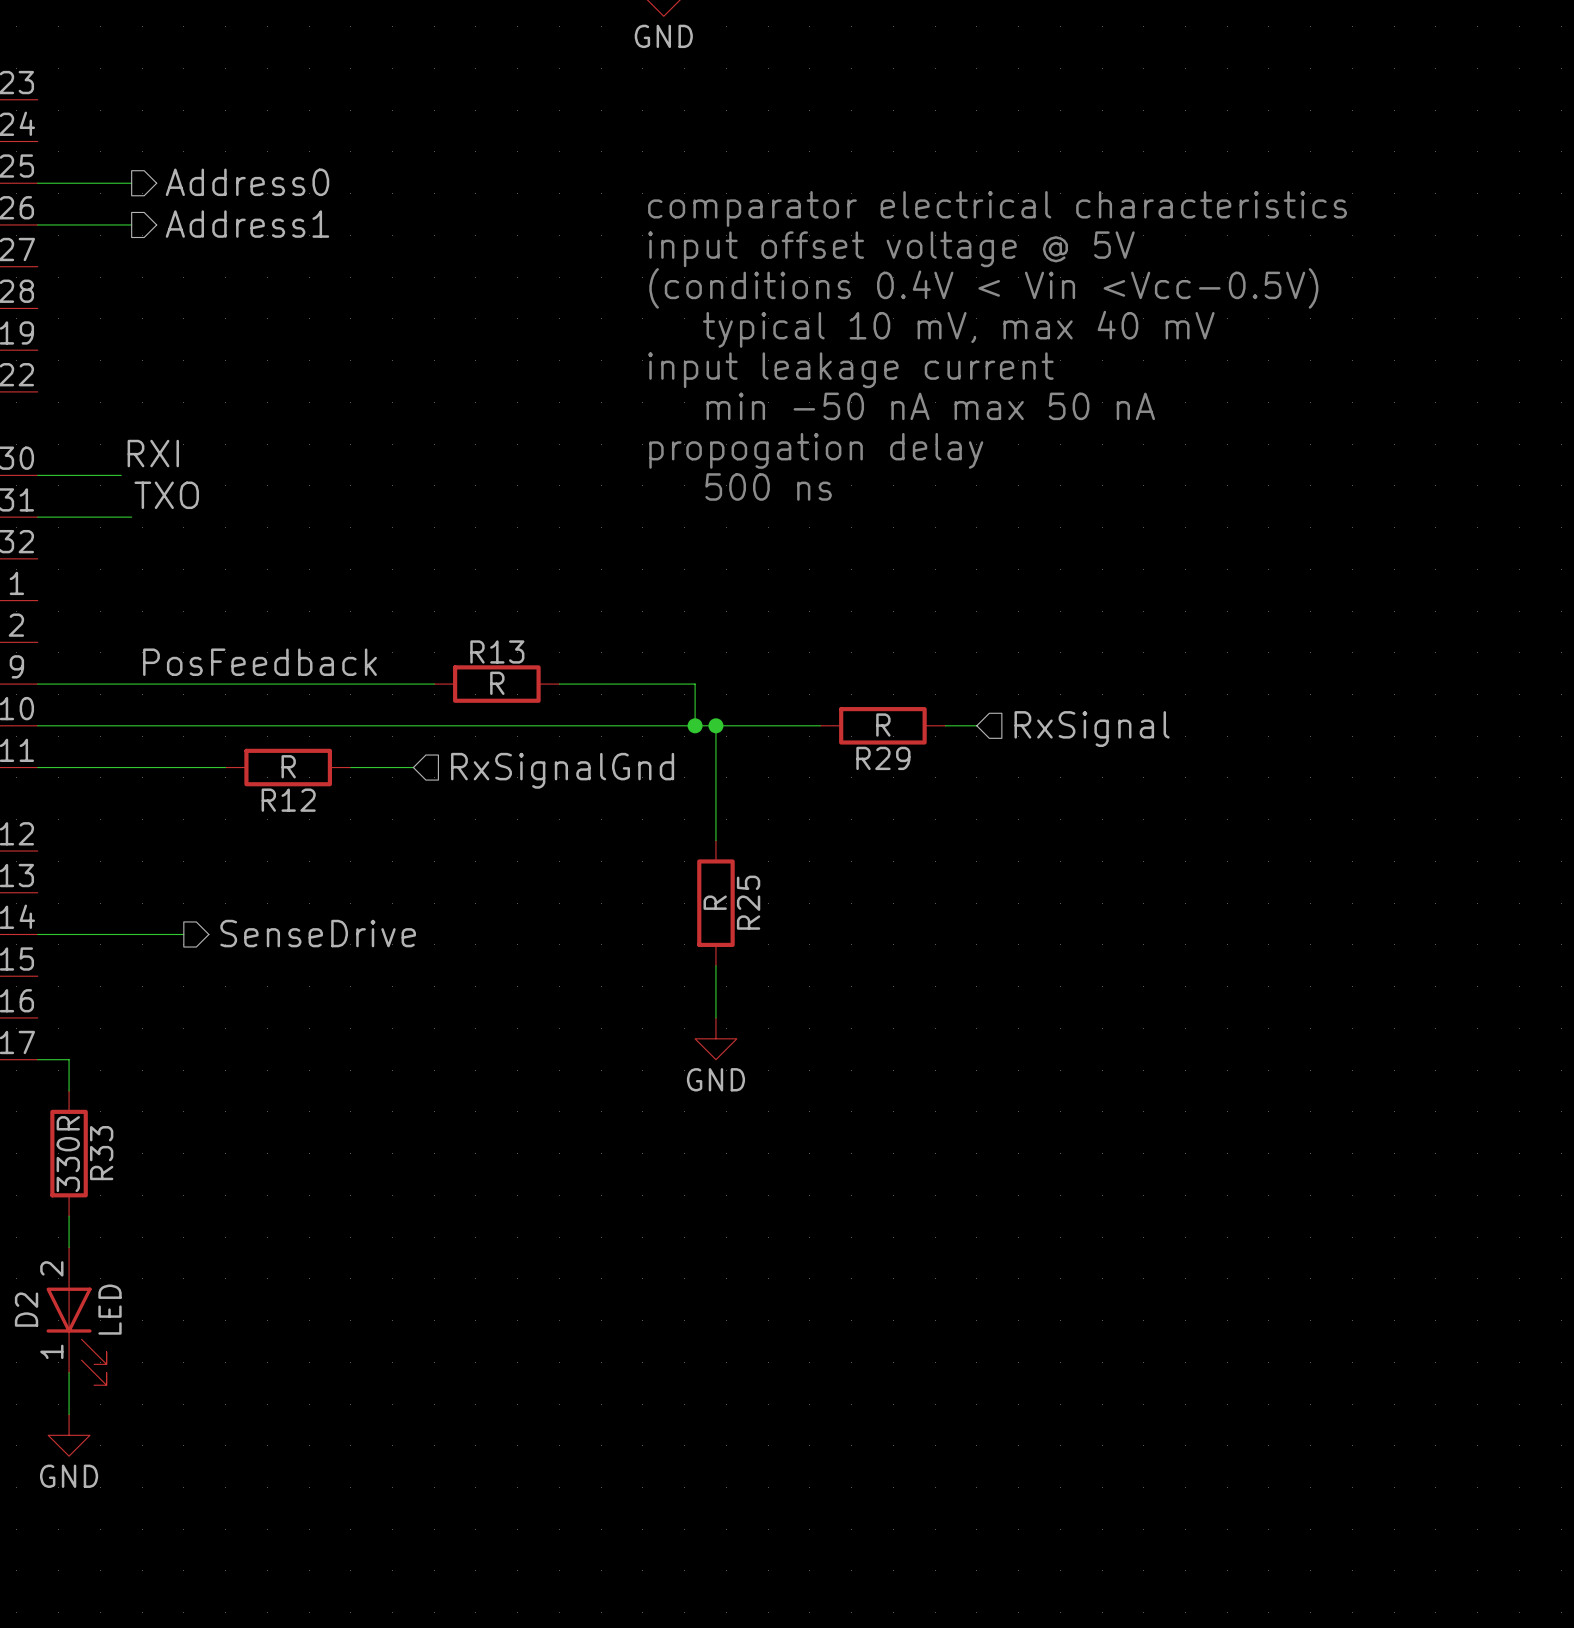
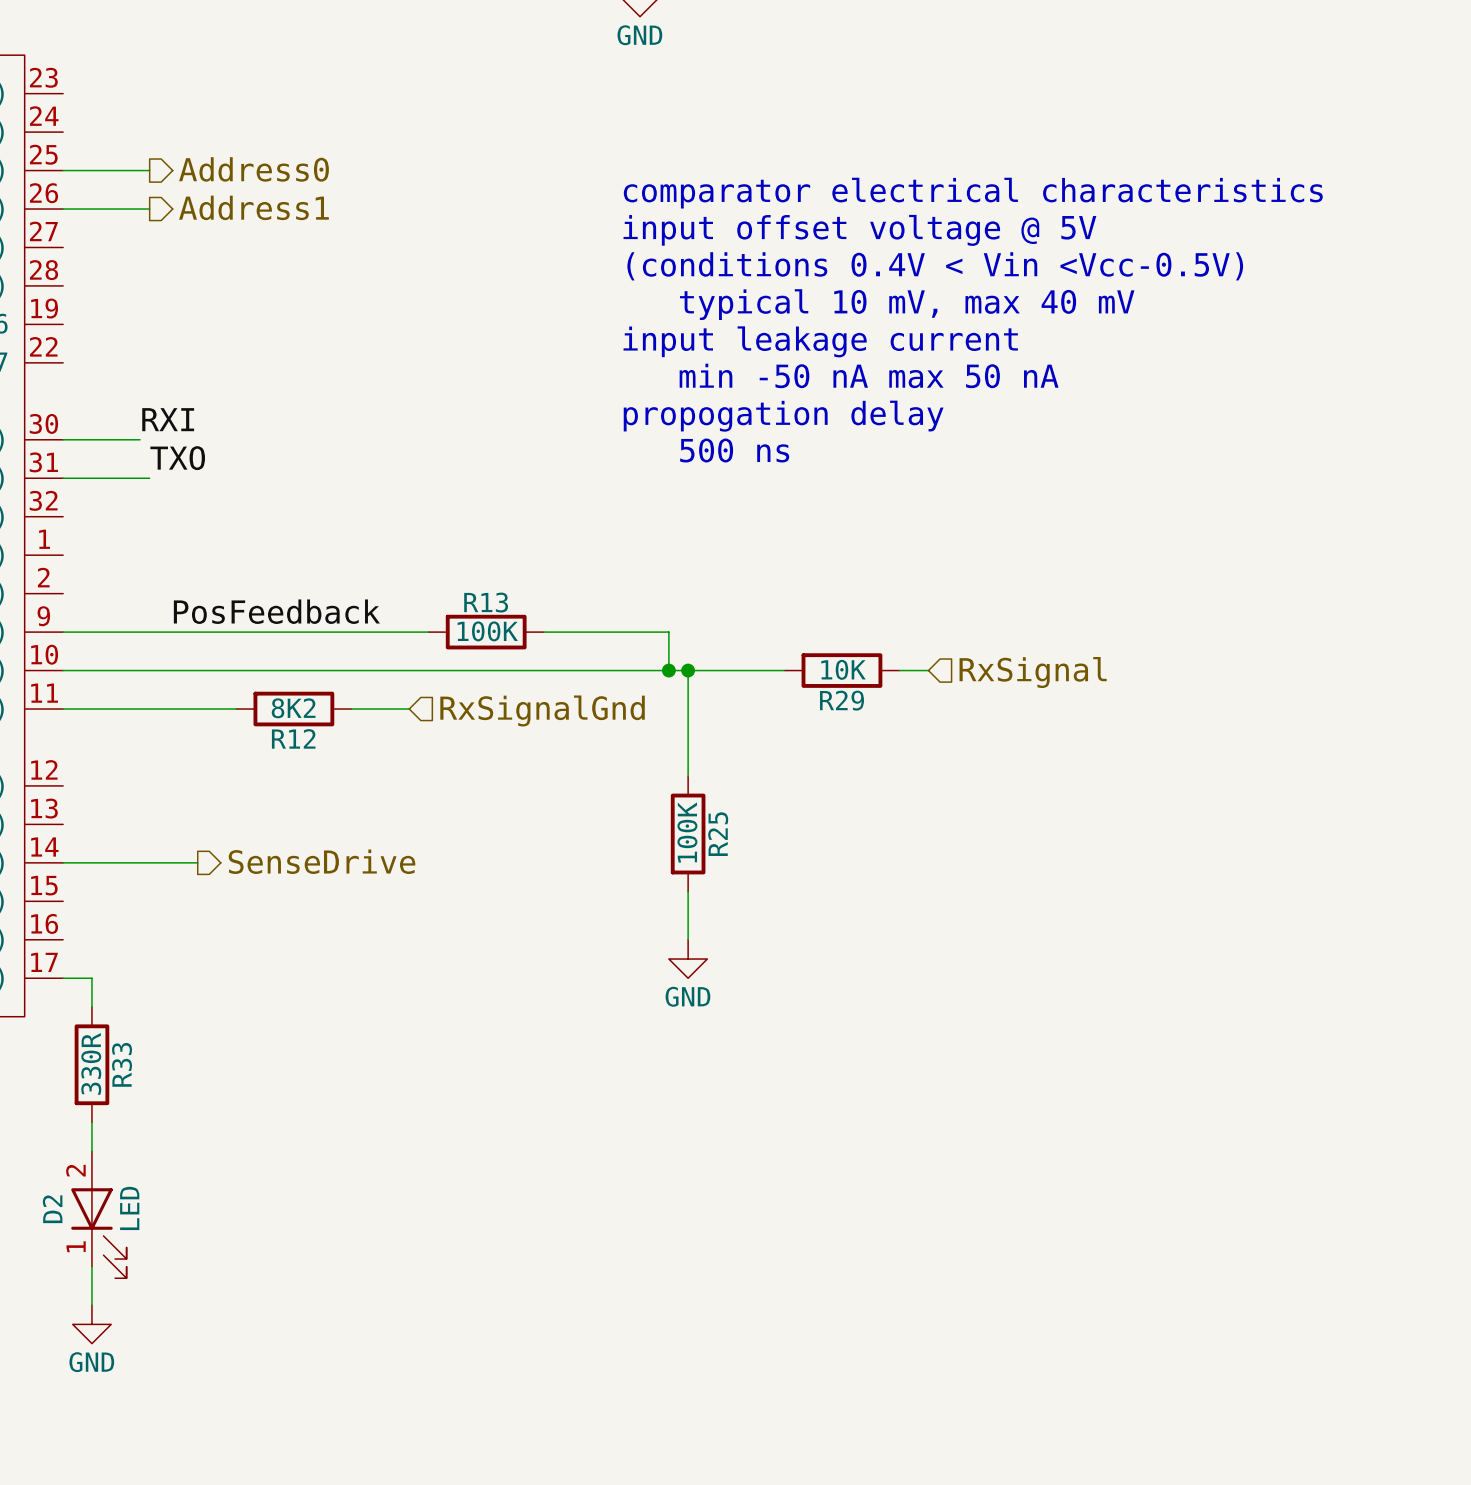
R13 value: R (497, 683) -> 100K (487, 631)
R29 value: R (883, 725) -> 10K (843, 669)
R12 value: R (288, 766) -> 8K2 (293, 708)
R25 value: R (715, 902) -> 100K (687, 832)

